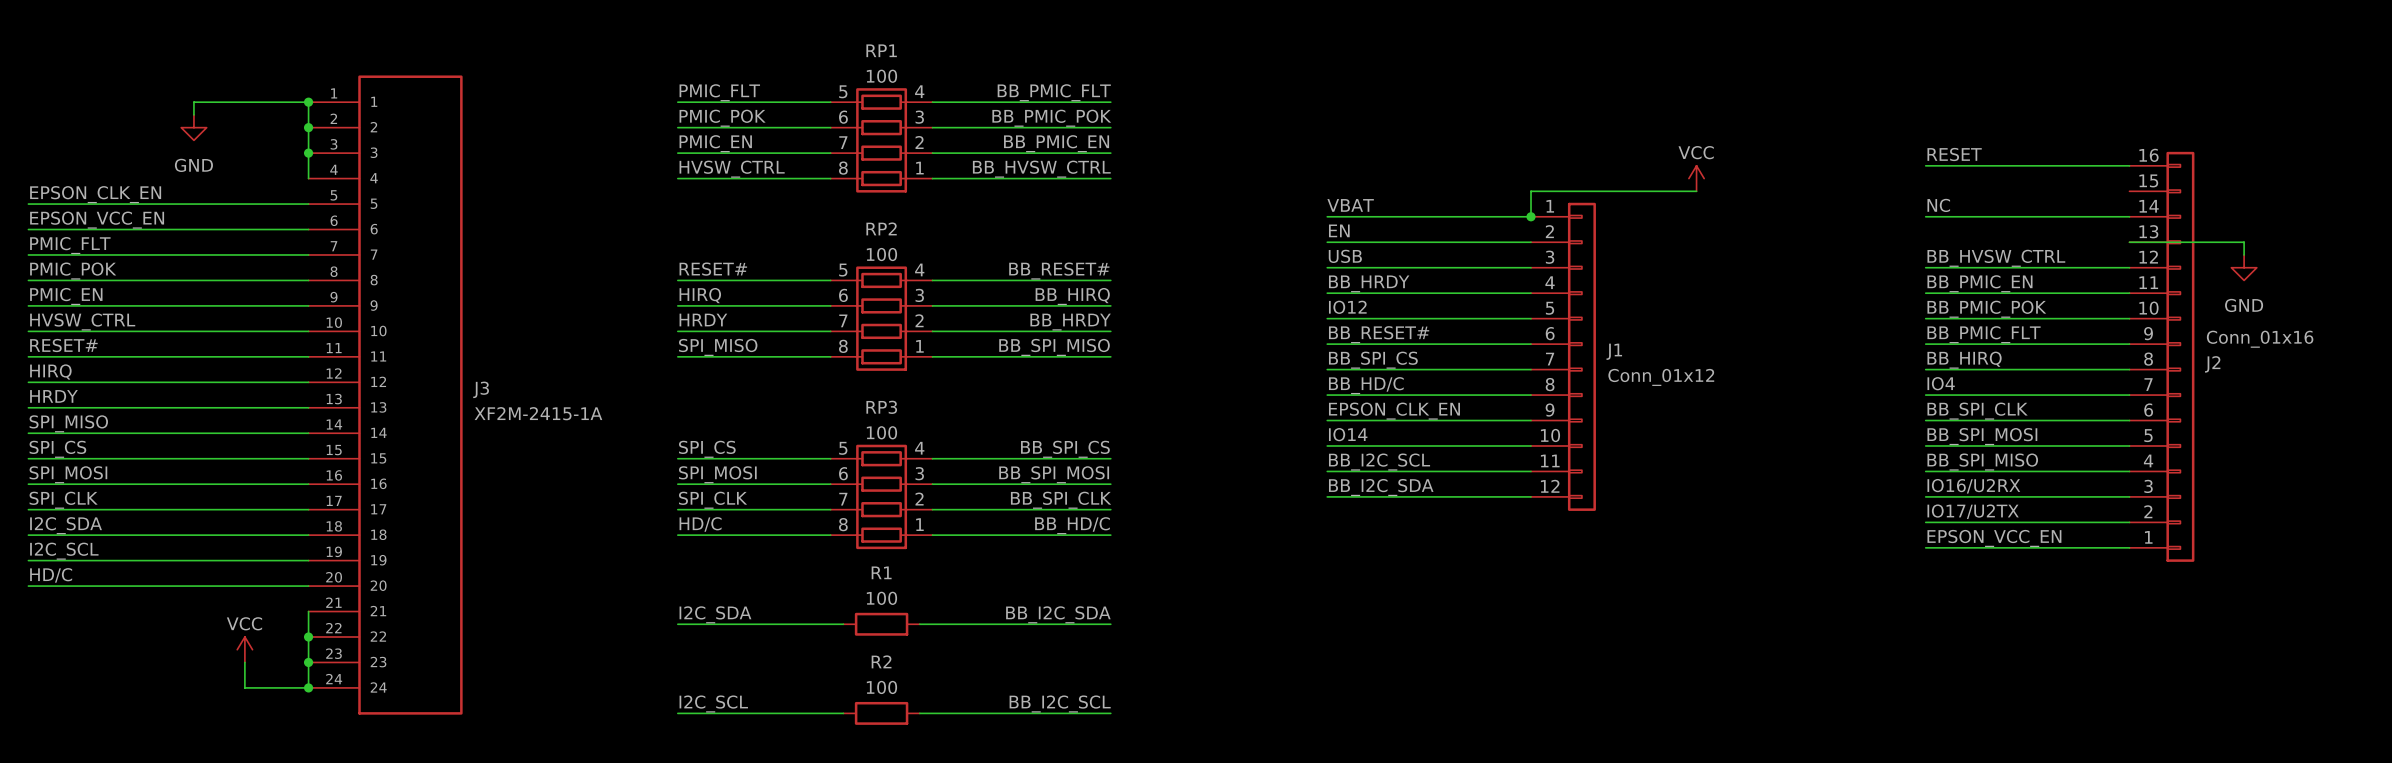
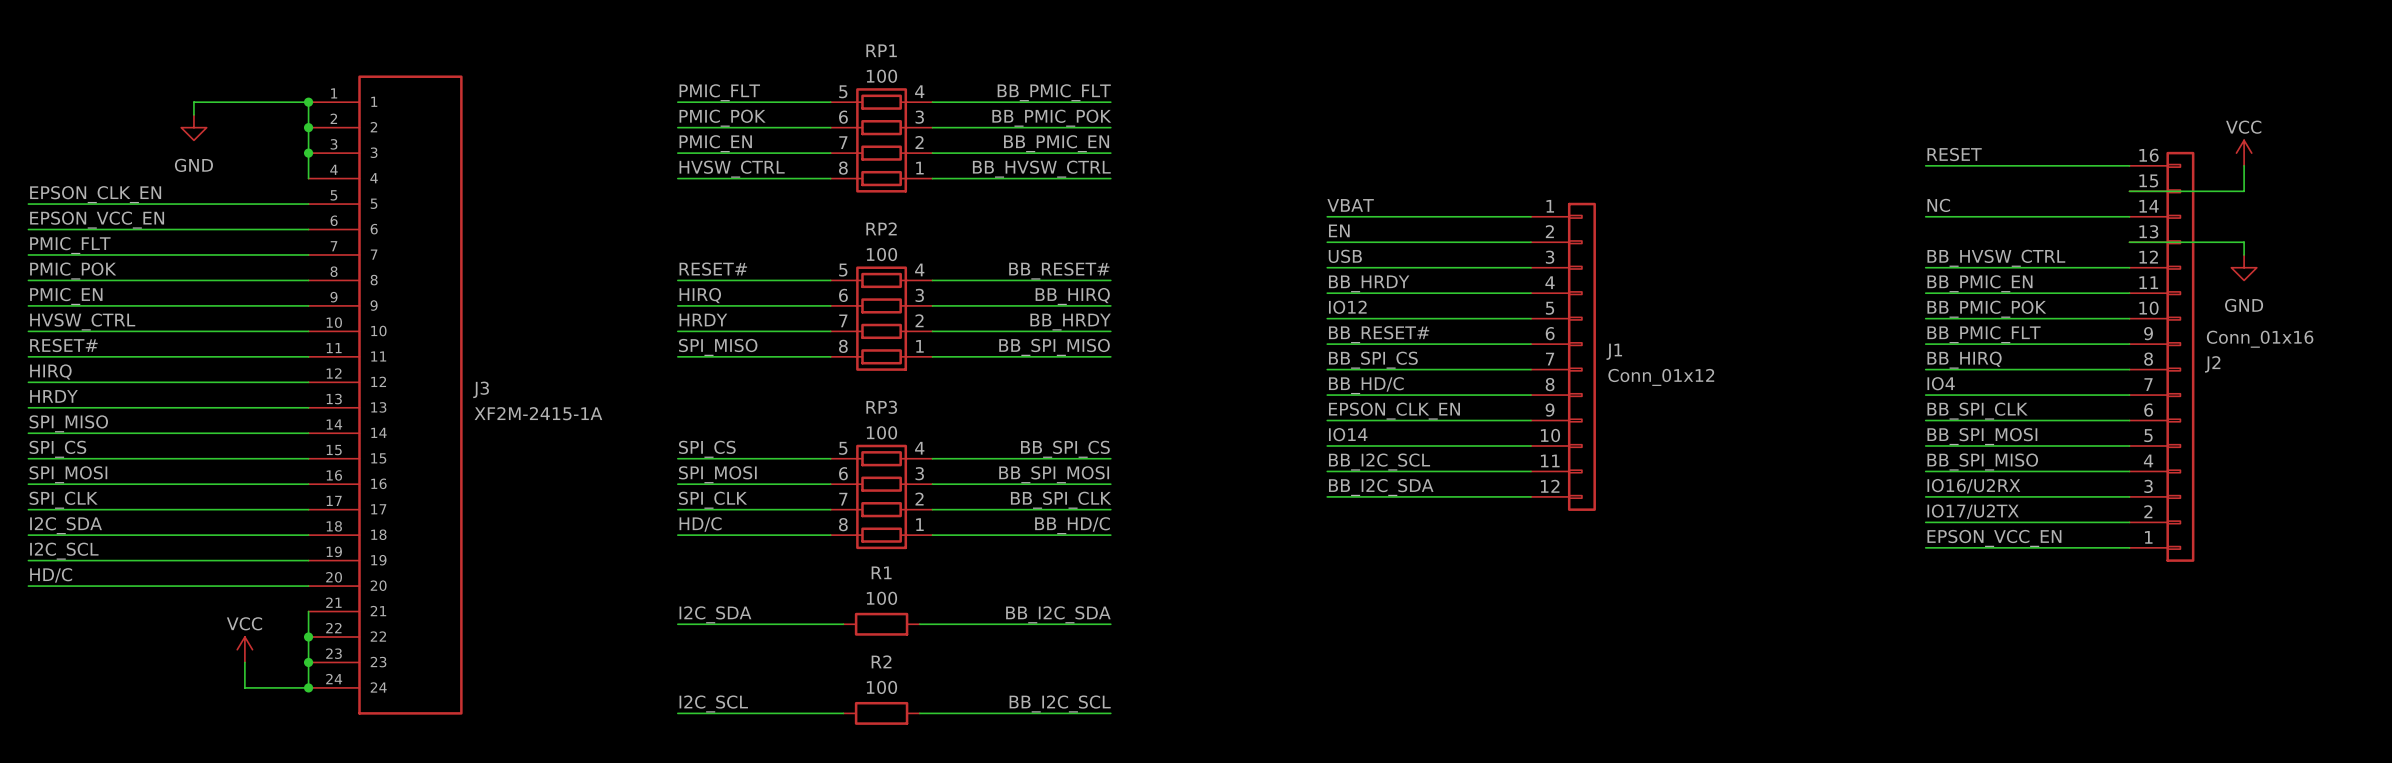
power symbol: none -> VCC (2244, 153)
wire: none -> (2244, 165) (2244, 191) (2129, 191)
power symbol: VCC (1696, 178) -> none
wire: (1696, 191) (1531, 191) (1531, 216) -> none
junction: (1531, 216) -> none

